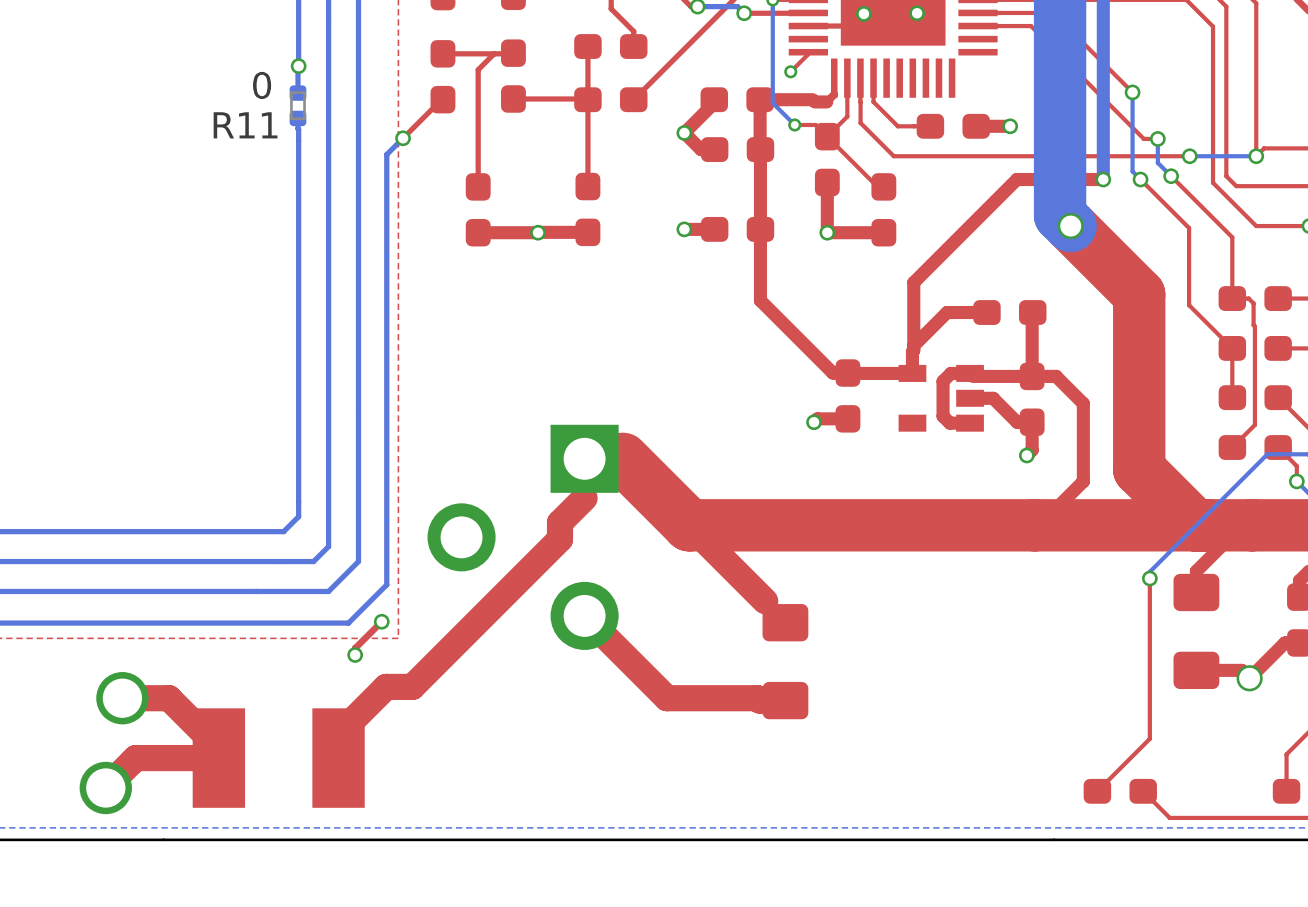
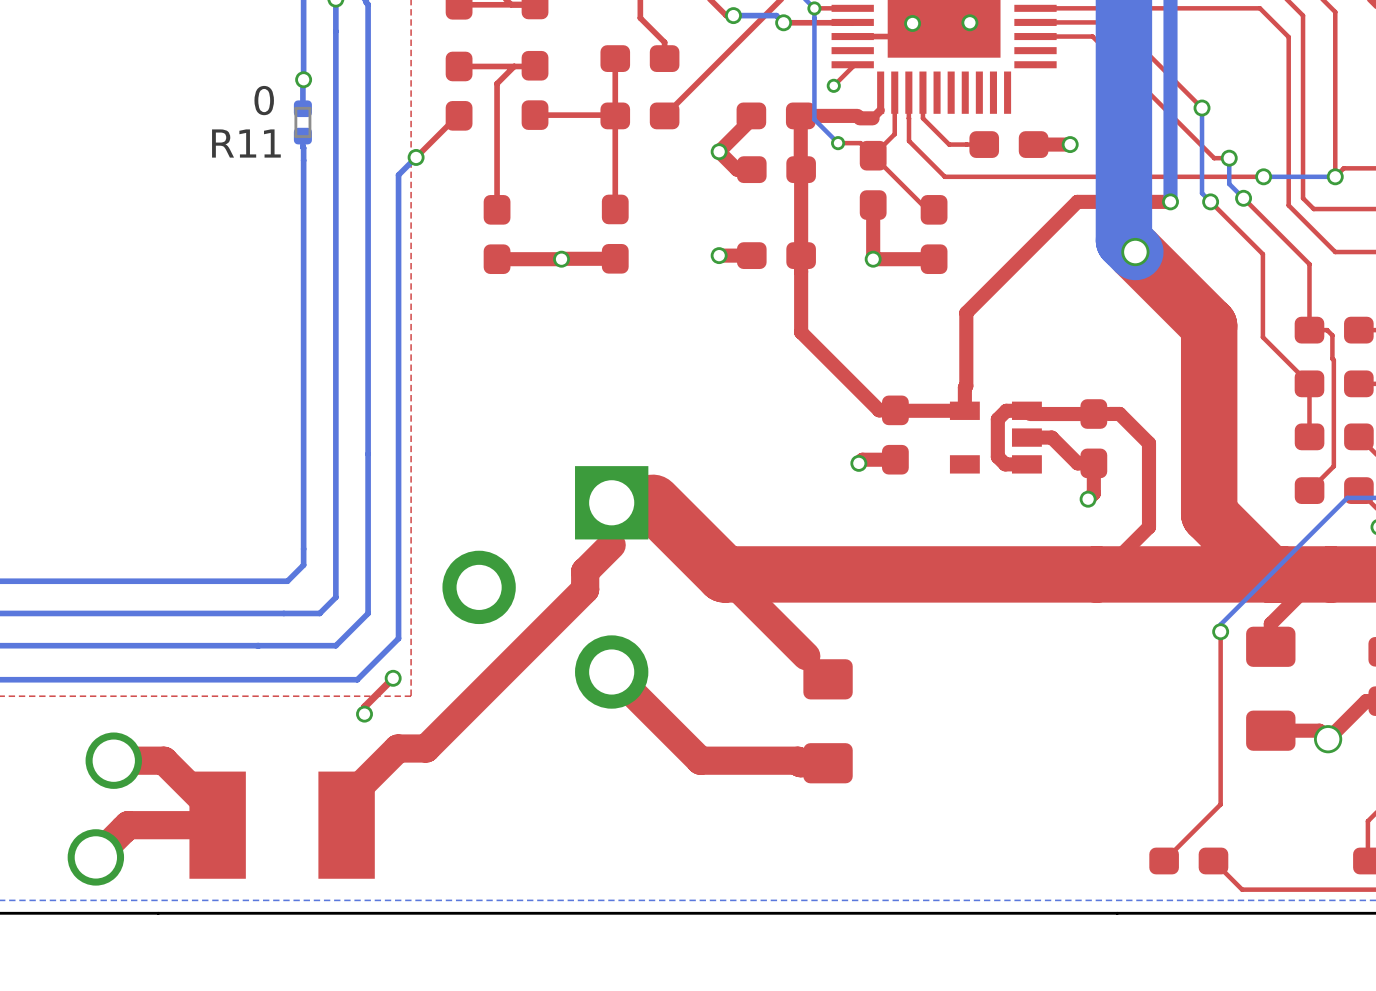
top track: (986, 312) (947, 312) (913, 345) -> none
part: (1009, 312) -> none
top track: (1032, 312) (1032, 376) -> none

